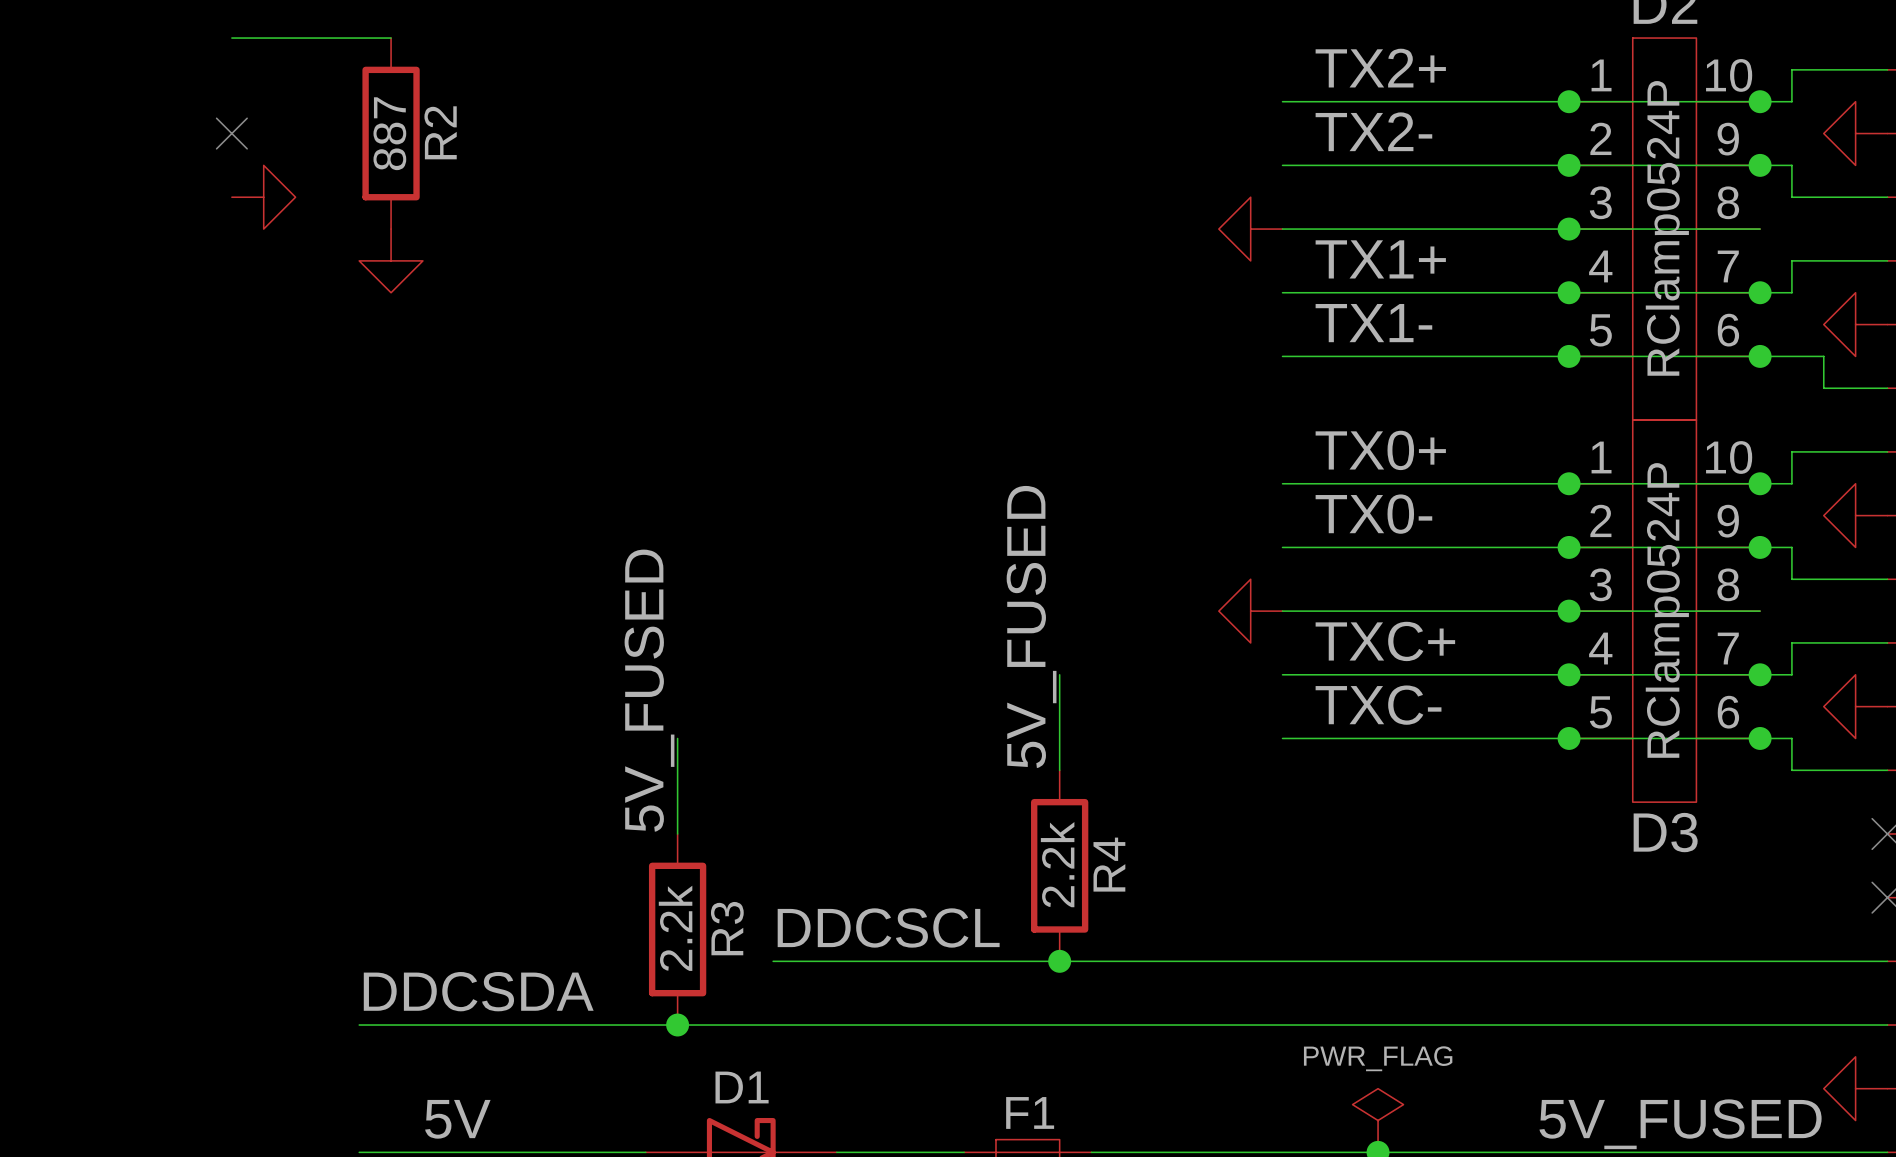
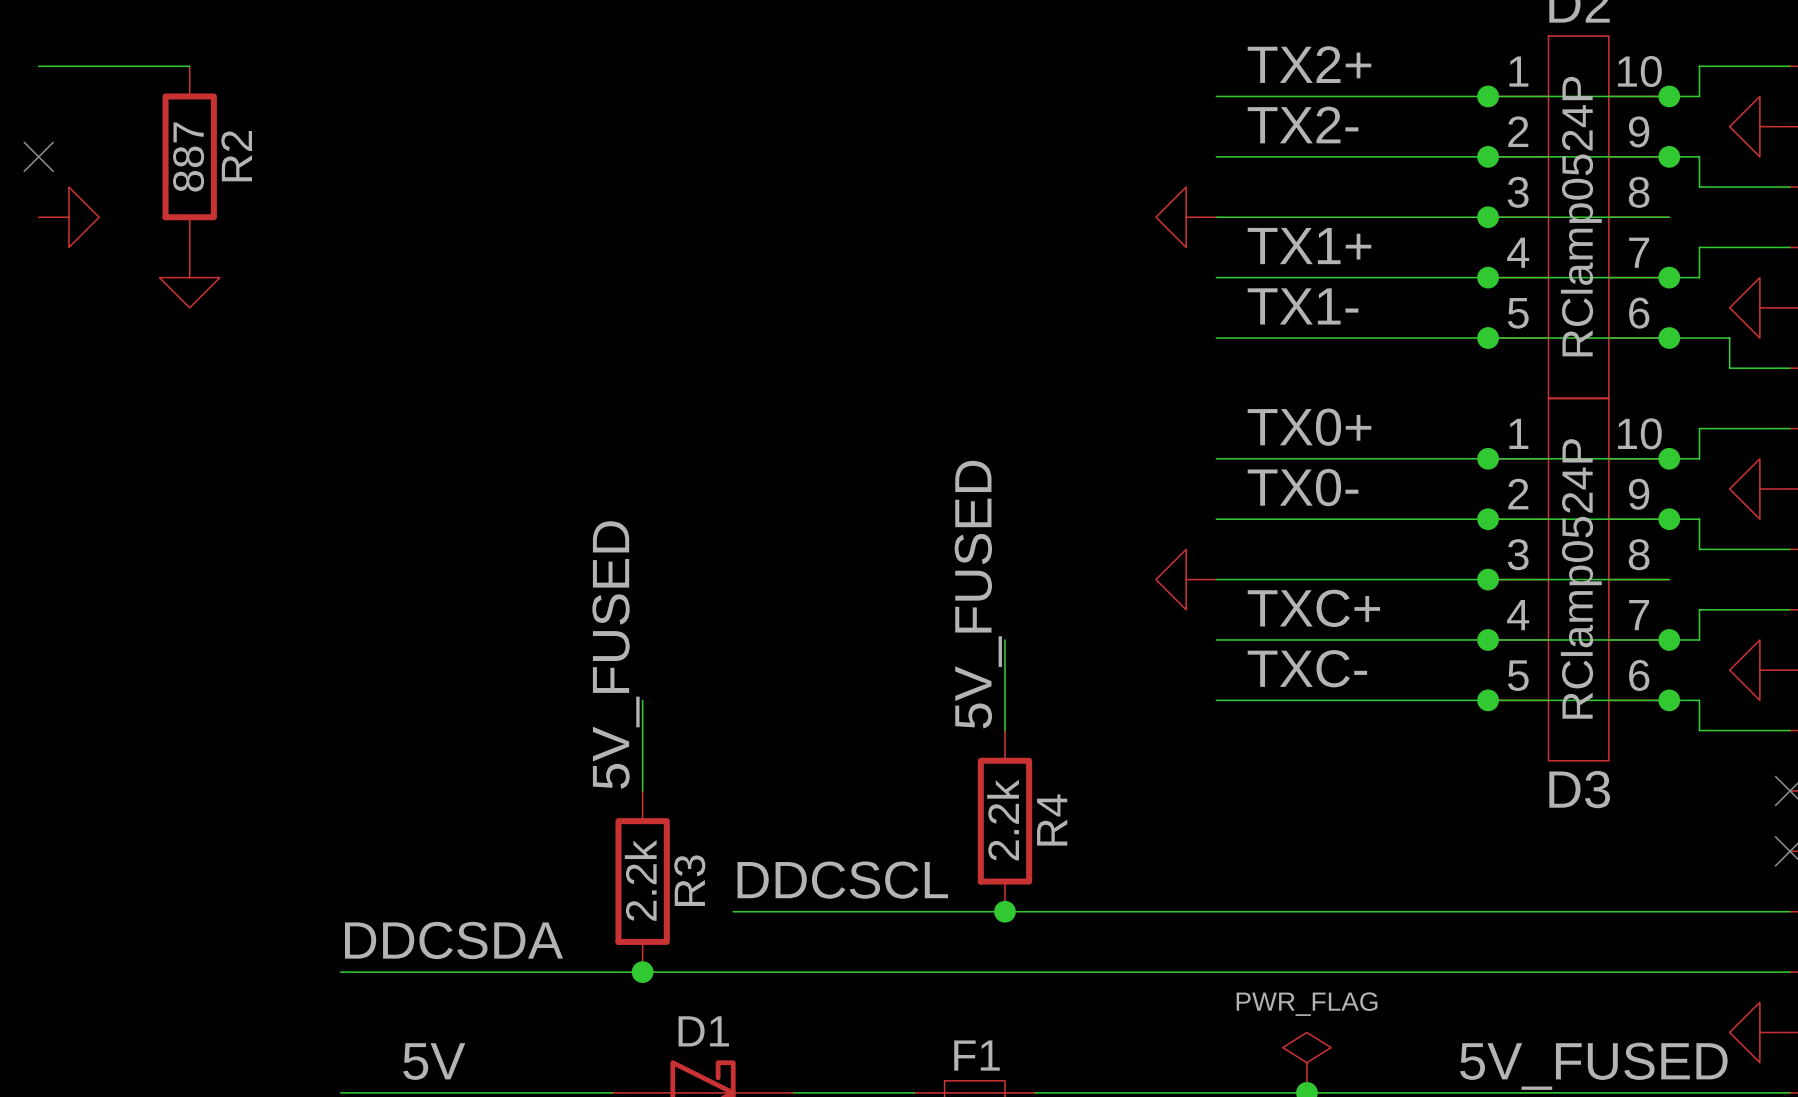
wire: (231, 38) (391, 38) -> (38, 66) (189, 66)
no-connect mark: (231, 133) -> none
R2 position: (391, 133) -> (189, 156)
no-connect mark: none -> (38, 156)
power symbol: (263, 197) -> none
power symbol: none -> (68, 217)
power symbol: (391, 260) -> none
power symbol: none -> (189, 277)

